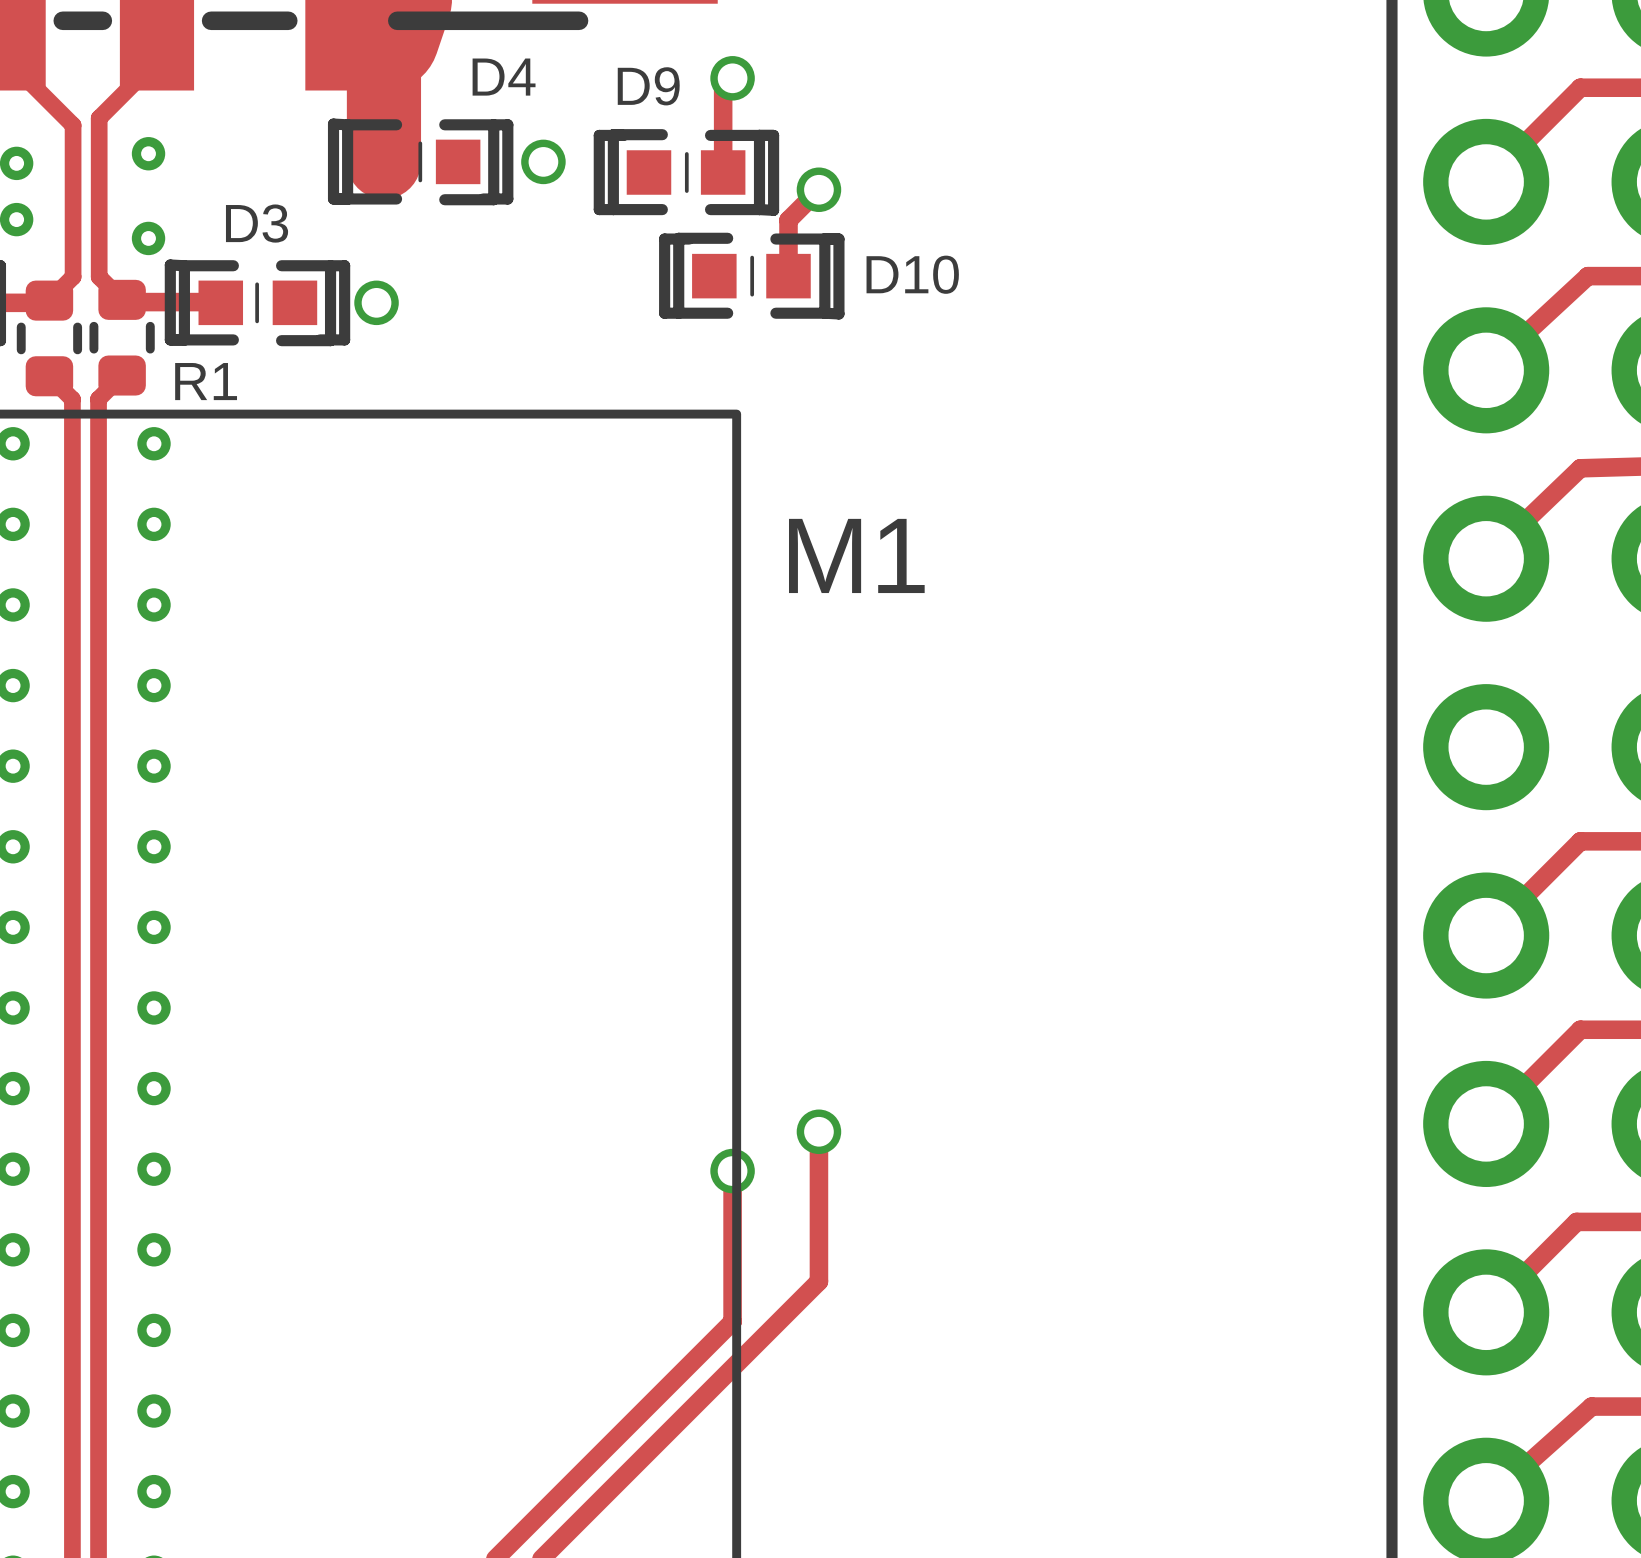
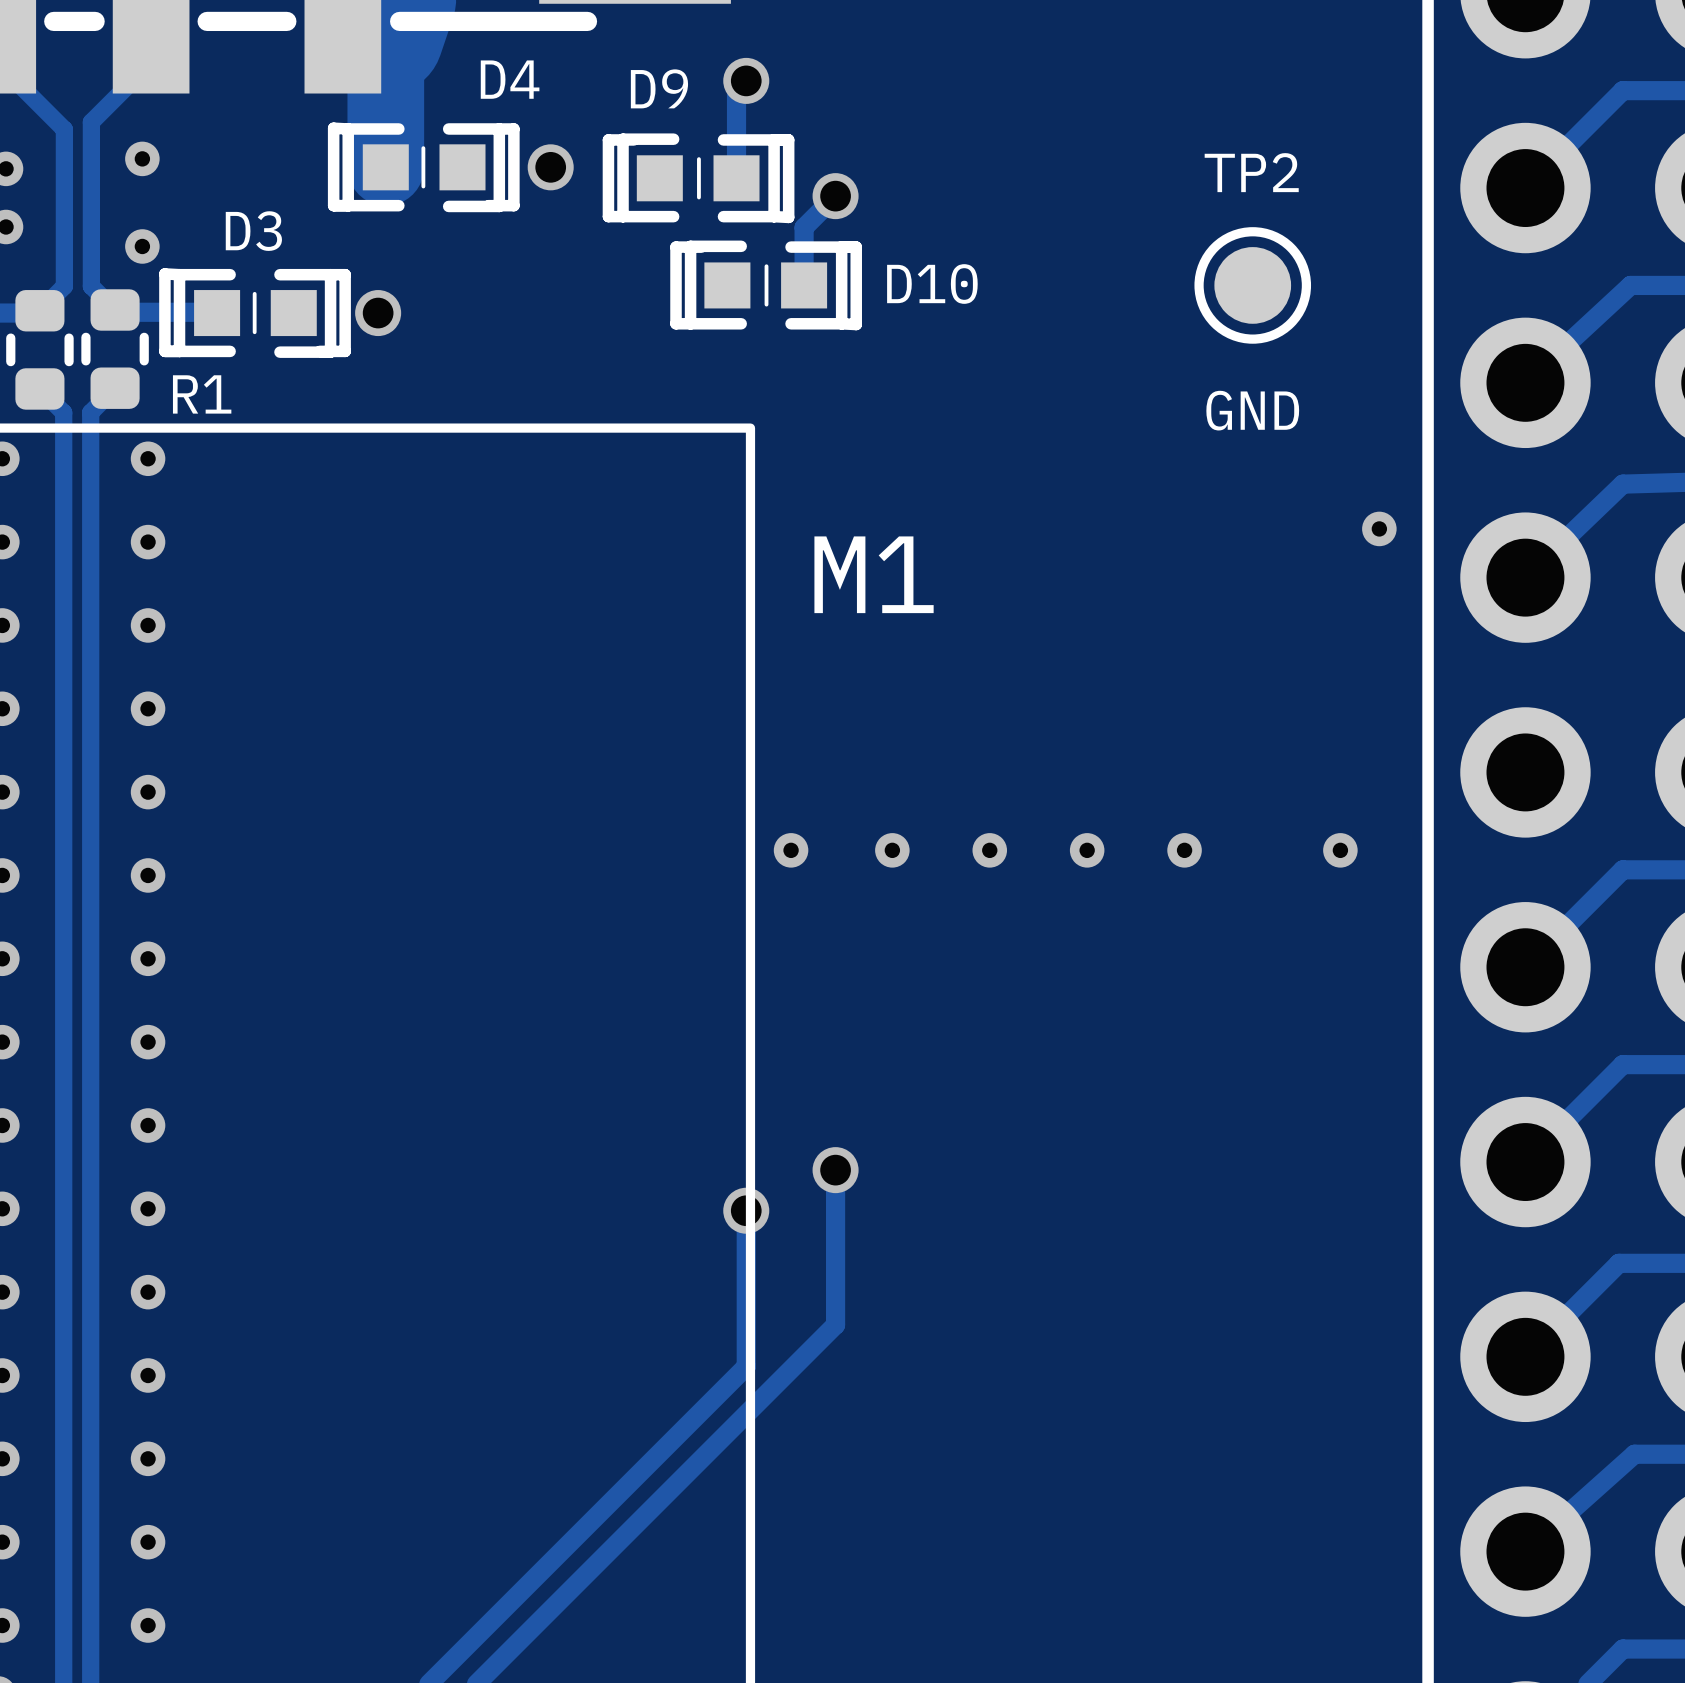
TP2: none -> (1252, 285)
text: none -> GND (1252, 410)
via: none -> (1379, 528)
via: none -> (791, 850)
via: none -> (892, 850)
via: none -> (989, 850)
via: none -> (1087, 850)
via: none -> (1184, 850)
via: none -> (1340, 850)

